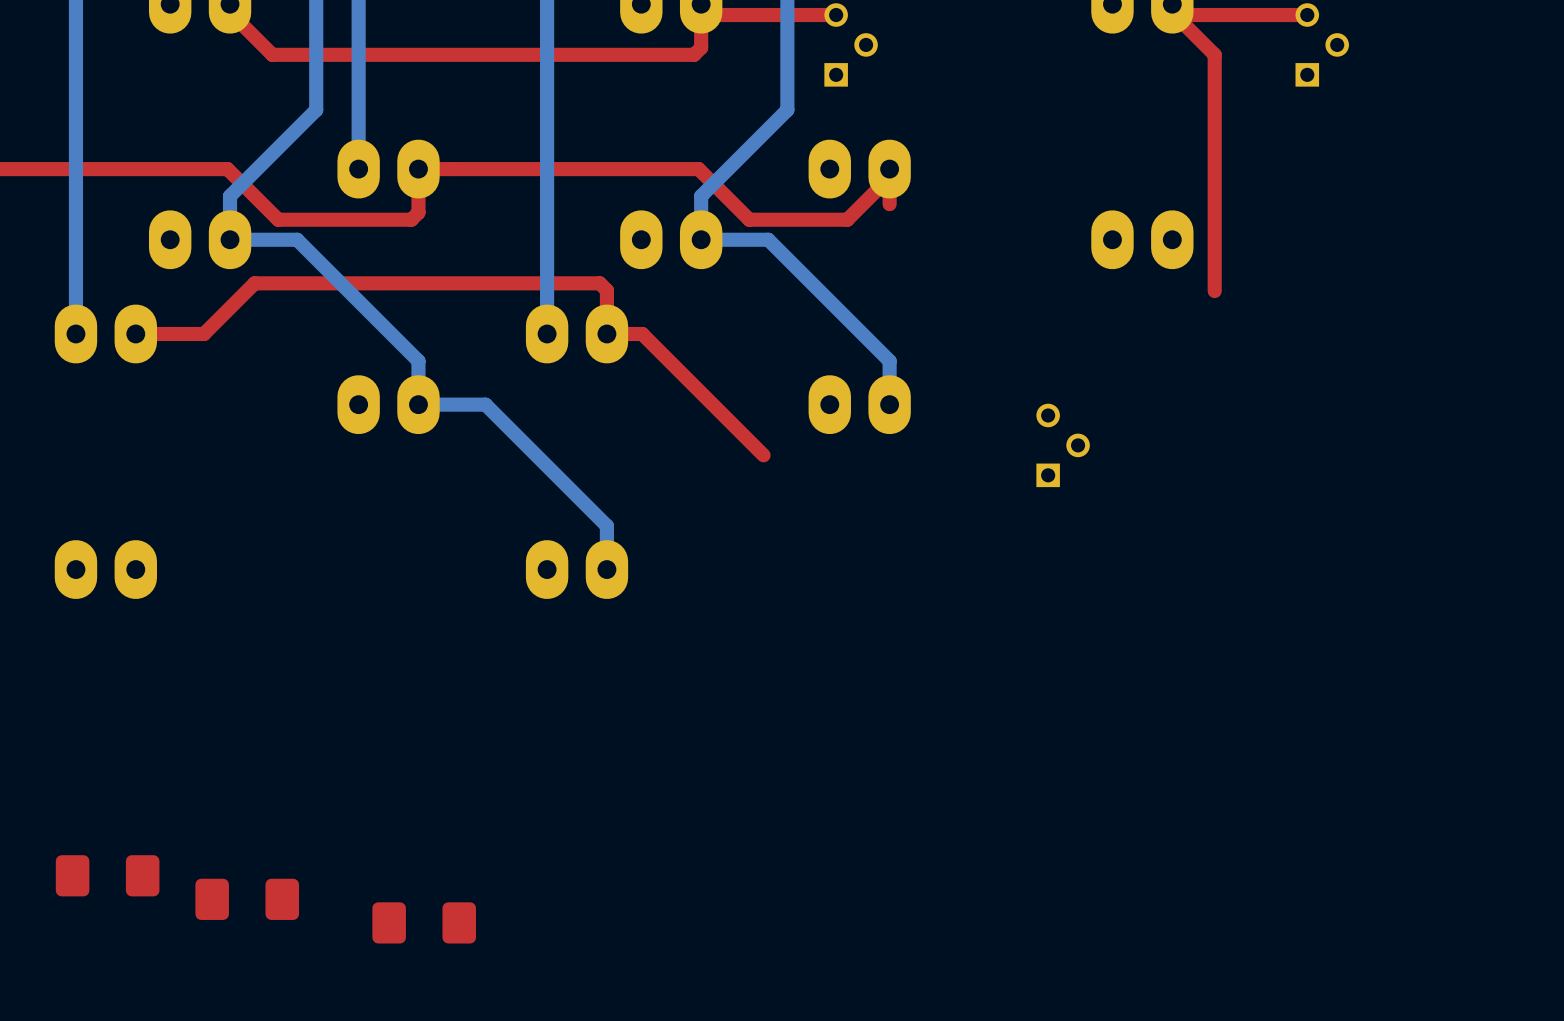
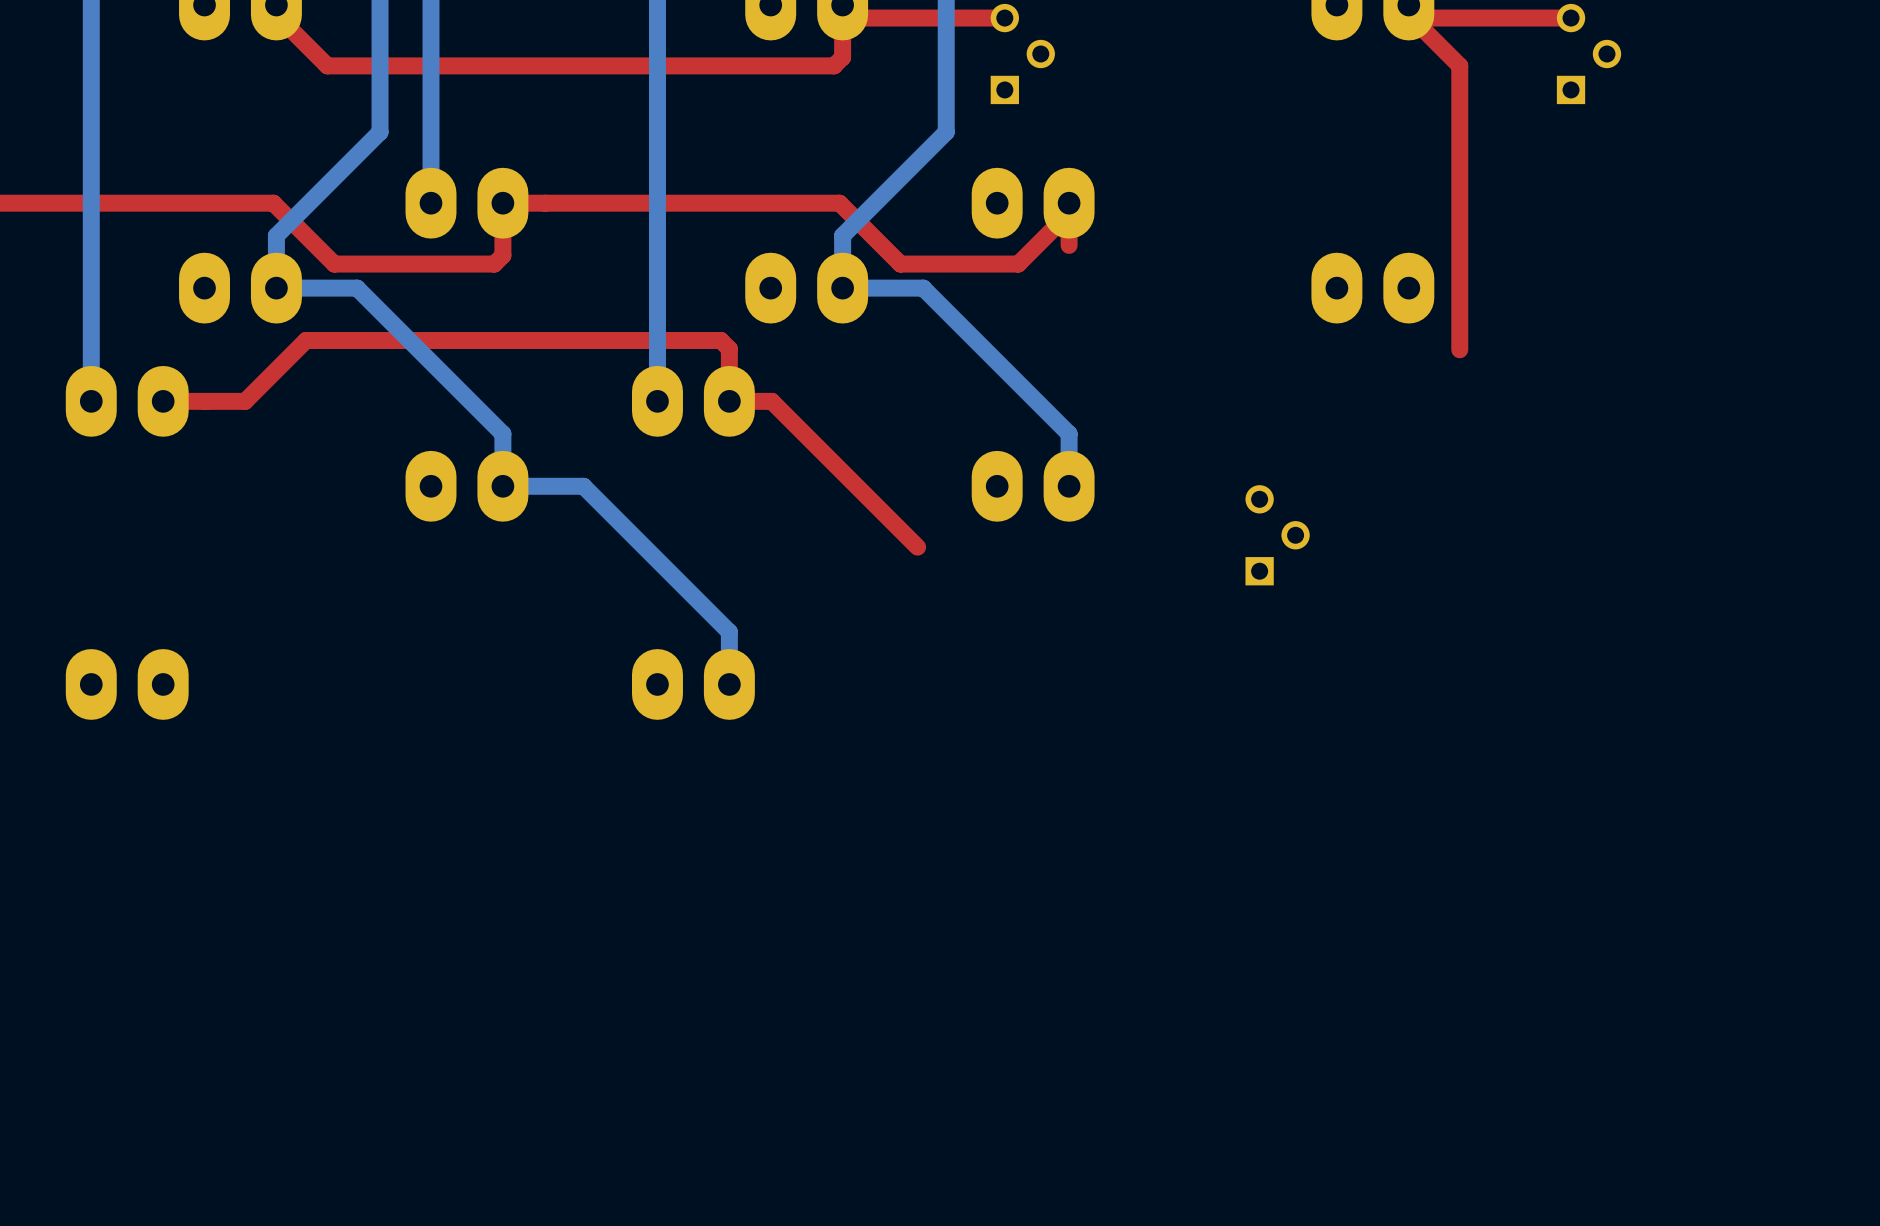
part: (107, 875) -> none
part: (247, 899) -> none
part: (424, 922) -> none

